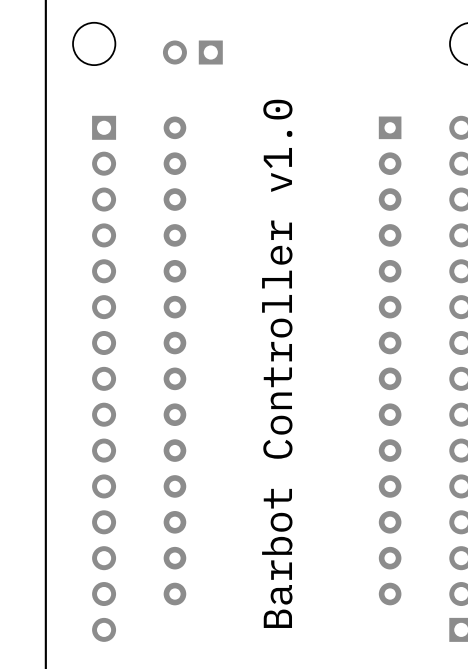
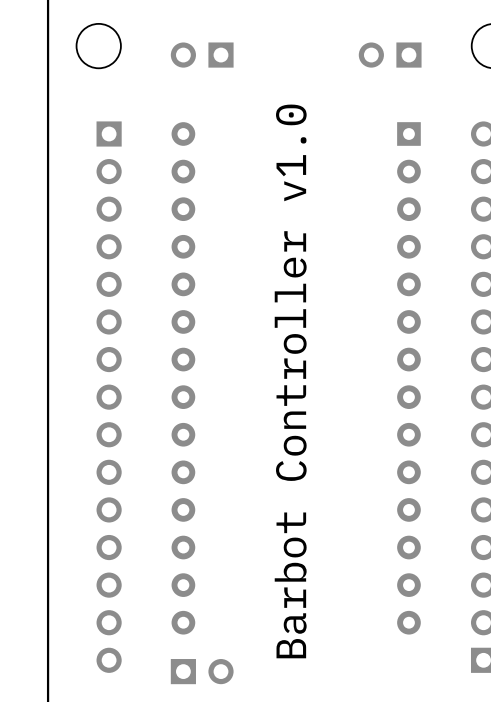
part: none -> (390, 55)
part: none -> (202, 671)

